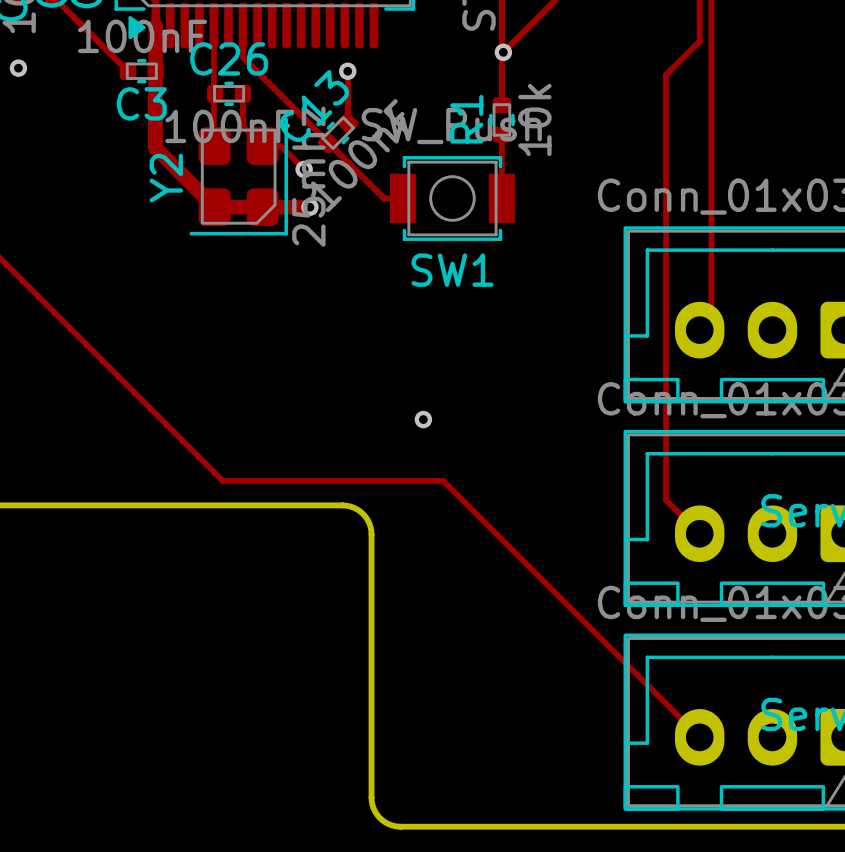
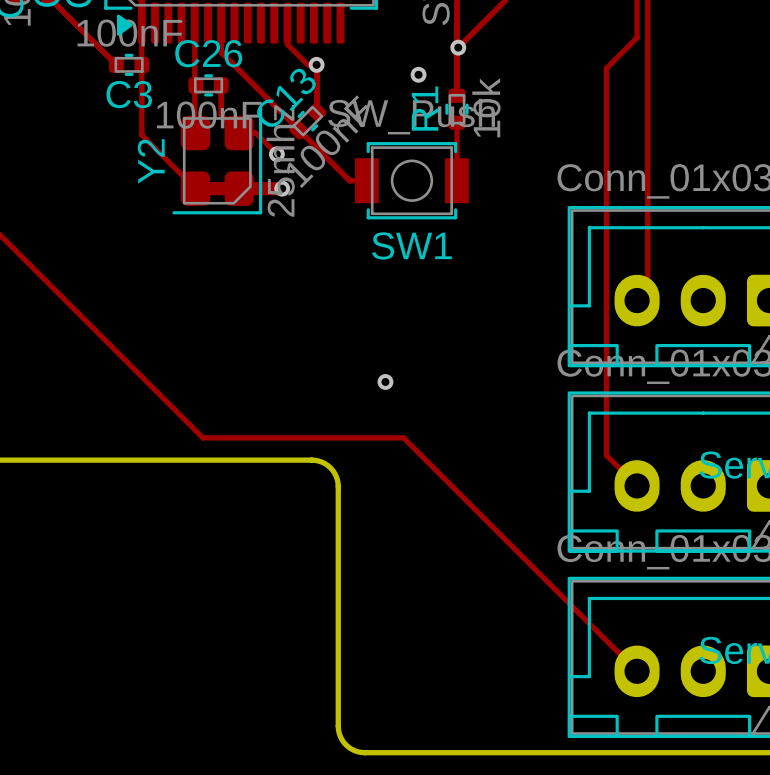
track width: thick (155, 25) (155, 148) (214, 207) -> thin (141, 23) (141, 135) (195, 188)
track: none -> (287, 23) (287, 44) (307, 64) (316, 64)
via: (18, 68) -> none
via: none -> (418, 74)

